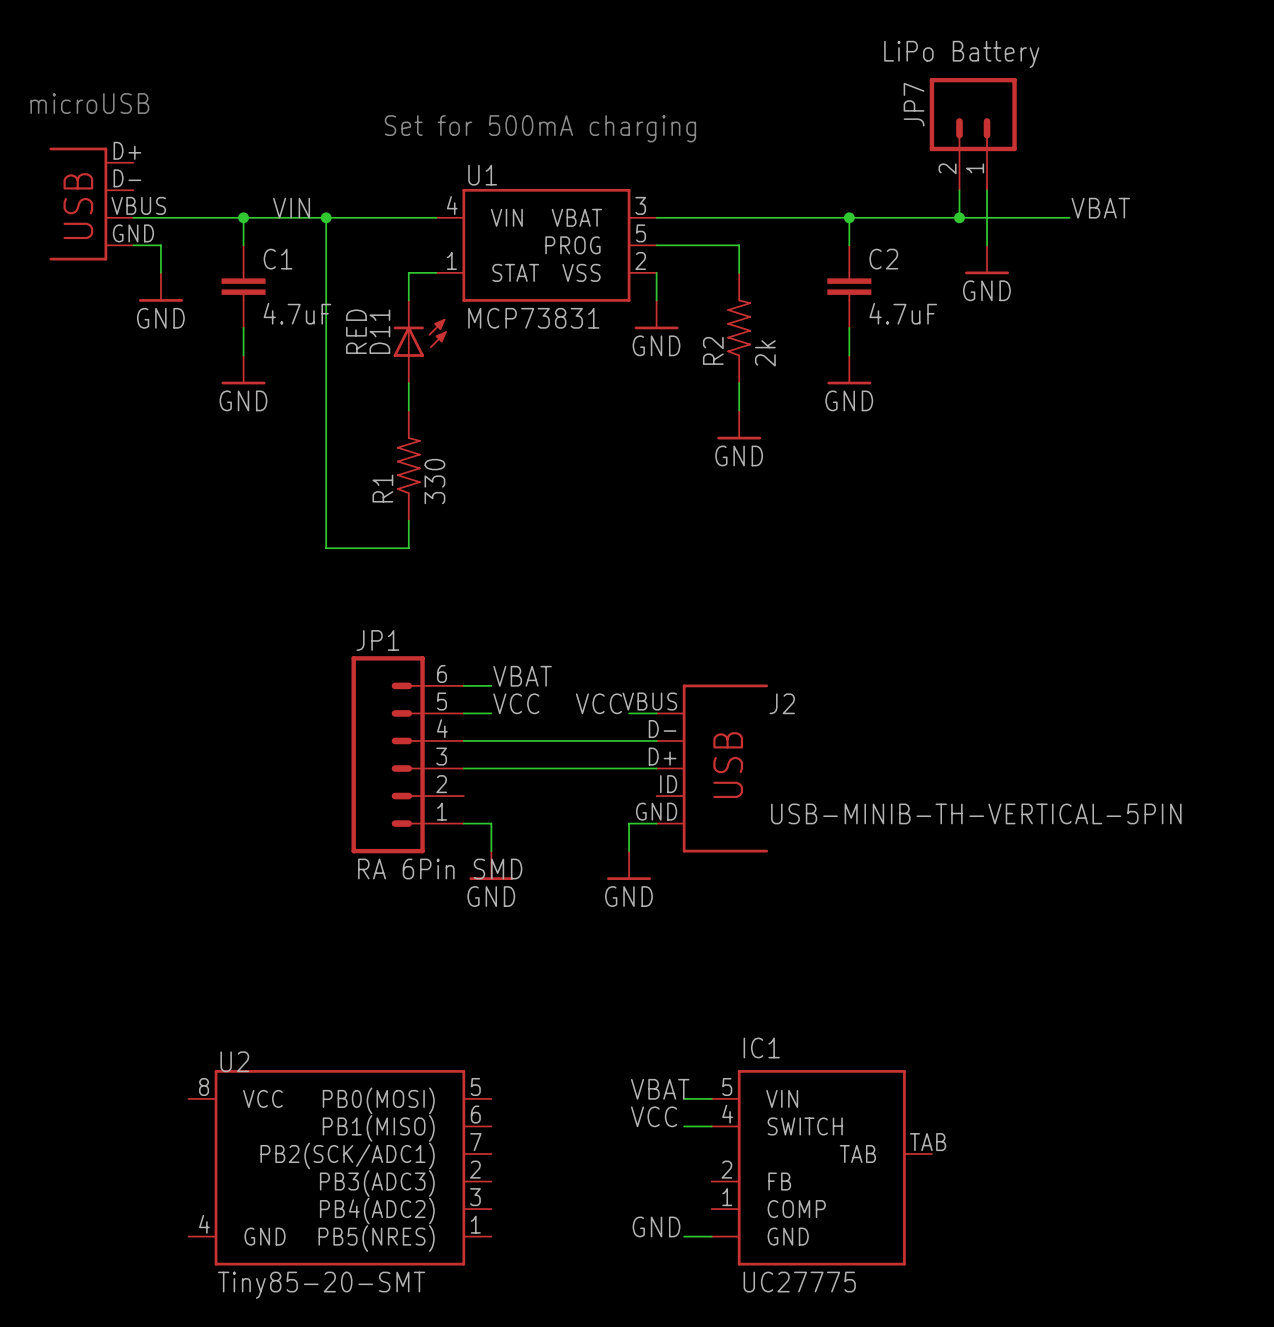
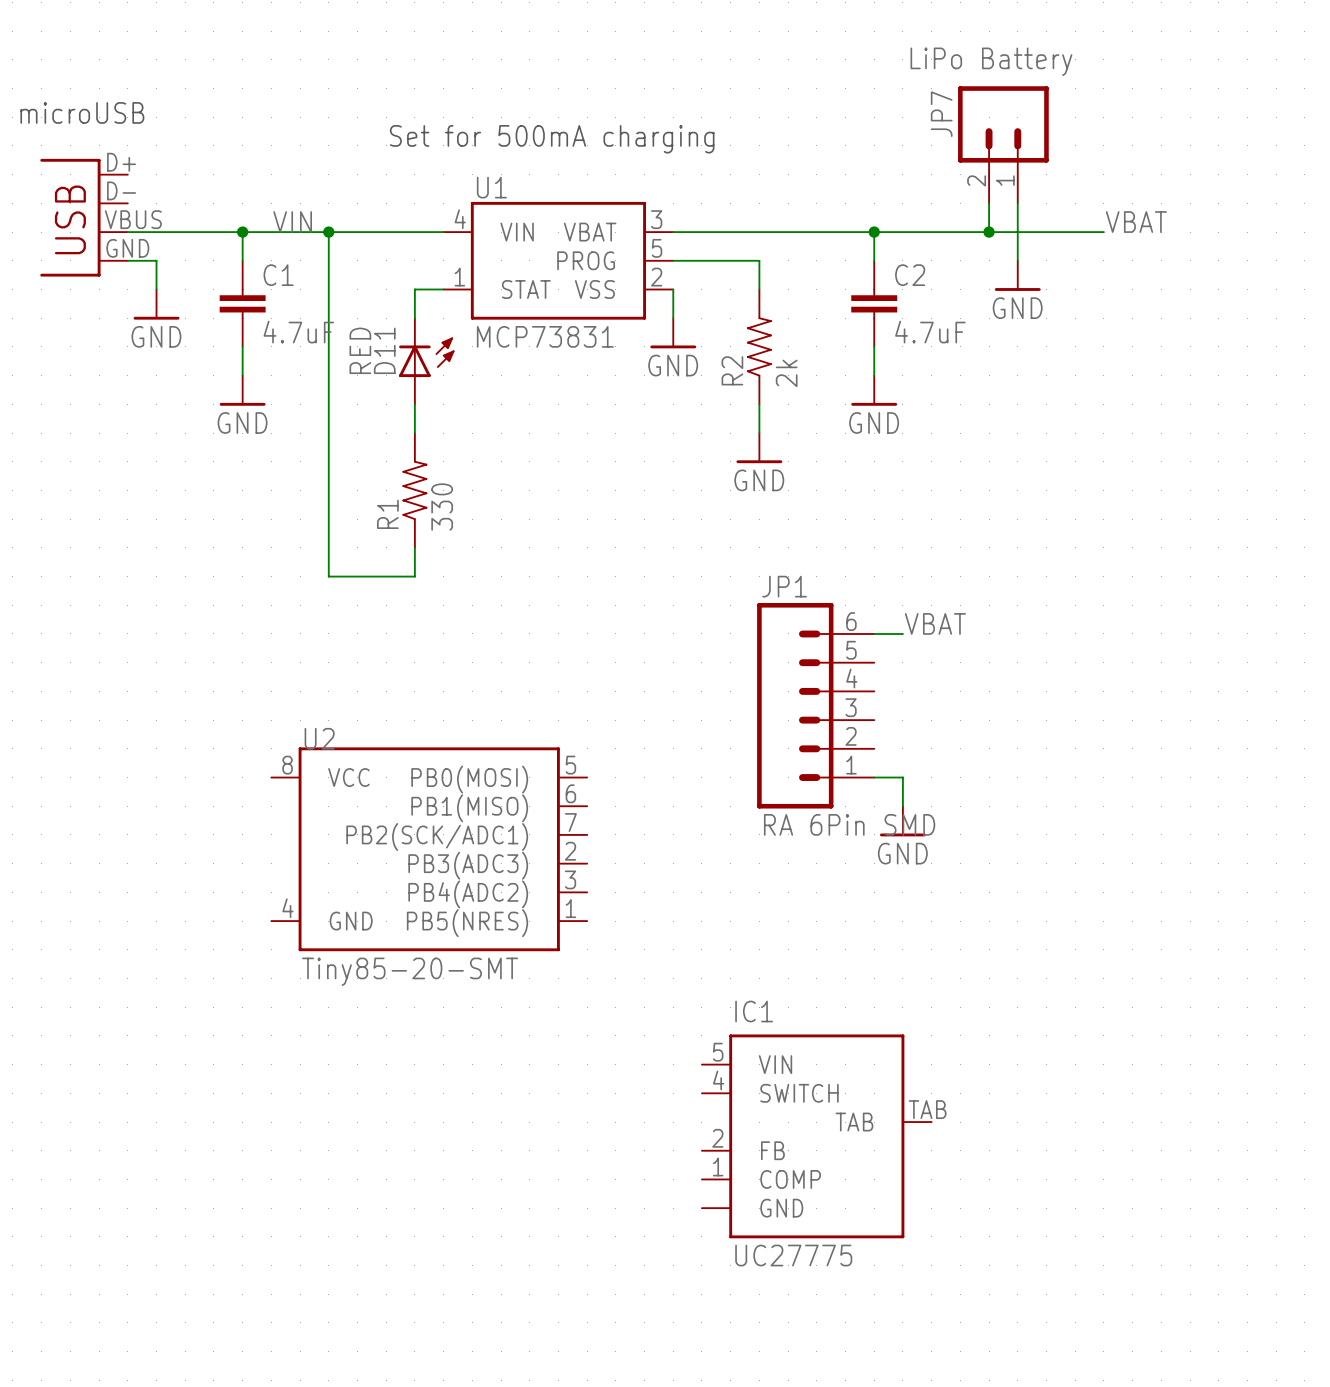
label: none -> VBAT (935, 623)
label: VBAT (522, 676) -> none
wire: (463, 685) (491, 685) -> none
label: VCC (516, 703) -> none
label: VCC (598, 703) -> none
wire: (629, 713) (656, 713) -> (874, 633) (902, 633)
wire: (463, 740) (656, 740) -> none
wire: none -> (874, 777) (902, 777) (902, 806)
JP1 position: (407, 754) -> (815, 705)
wire: (463, 768) (656, 768) -> none
J2: USB-MINIB-TH-VERTICAL-5PIN (712, 768) -> none
power symbol: none -> GND (902, 821)
wire: (463, 823) (491, 823) (491, 851) -> none
wire: (656, 823) (629, 823) (629, 851) -> none
power symbol: GND (491, 865) -> none
power symbol: GND (629, 865) -> none
label: VBAT (660, 1089) -> none
label: VCC (654, 1116) -> none
U2 position: (339, 1167) -> (429, 849)
IC1 position: (821, 1167) -> (816, 1136)
label: GND (656, 1226) -> none
wire: (684, 1236) (711, 1236) -> none

